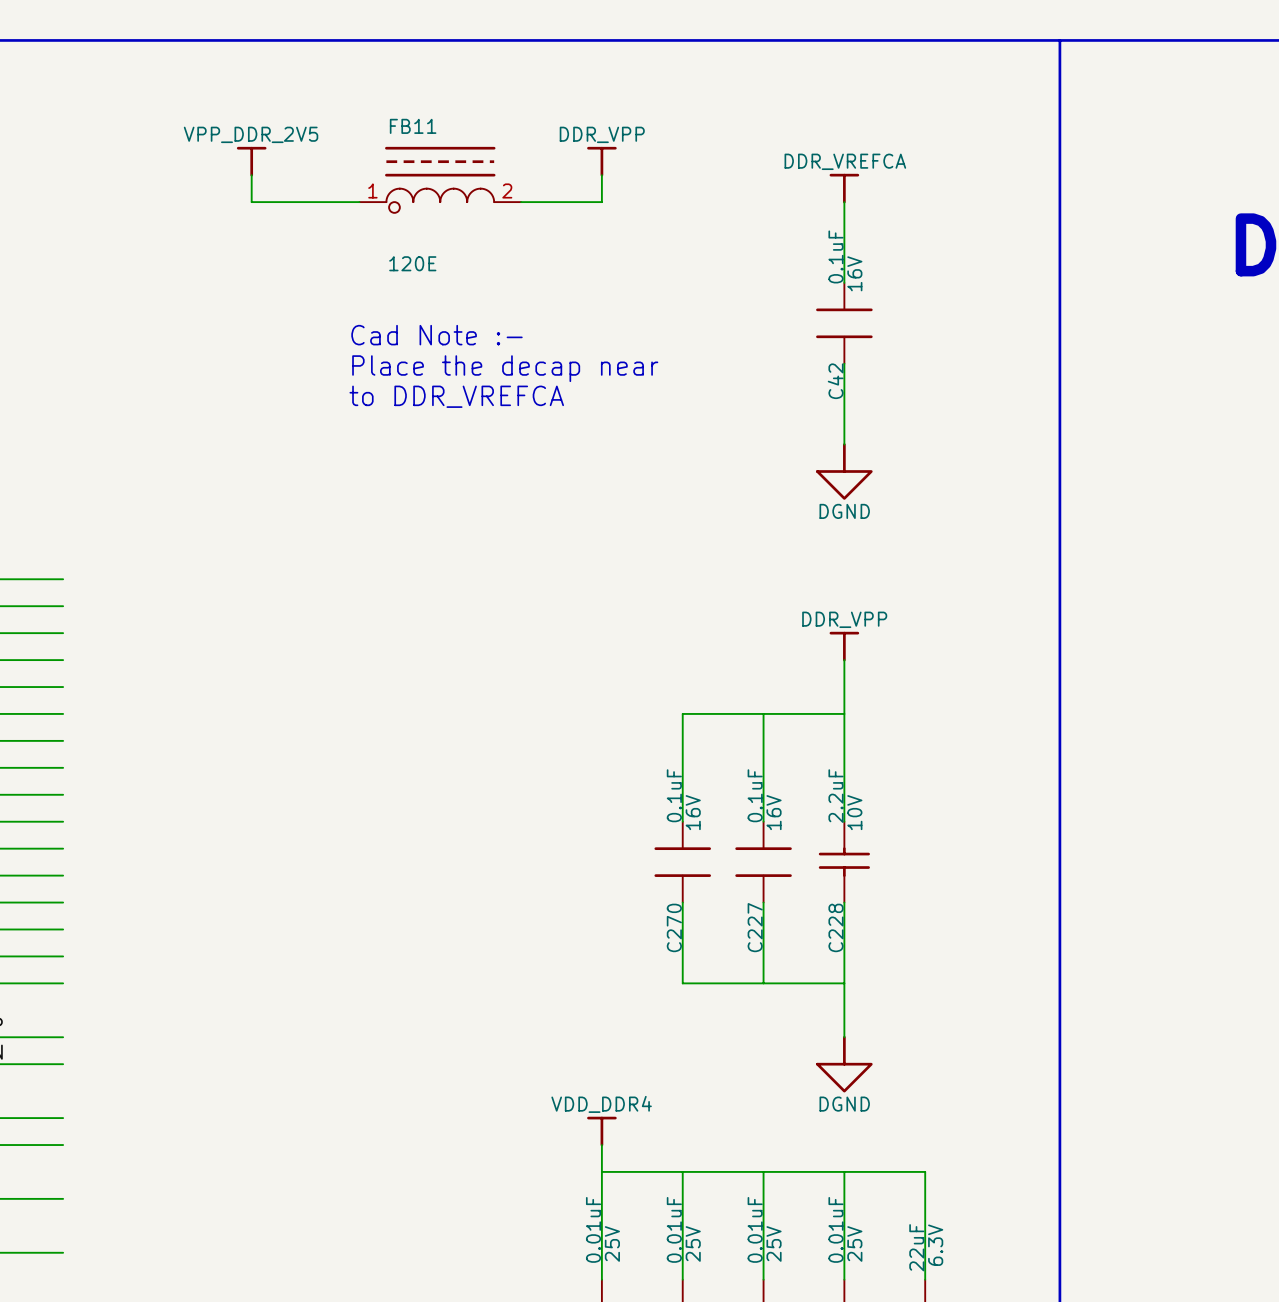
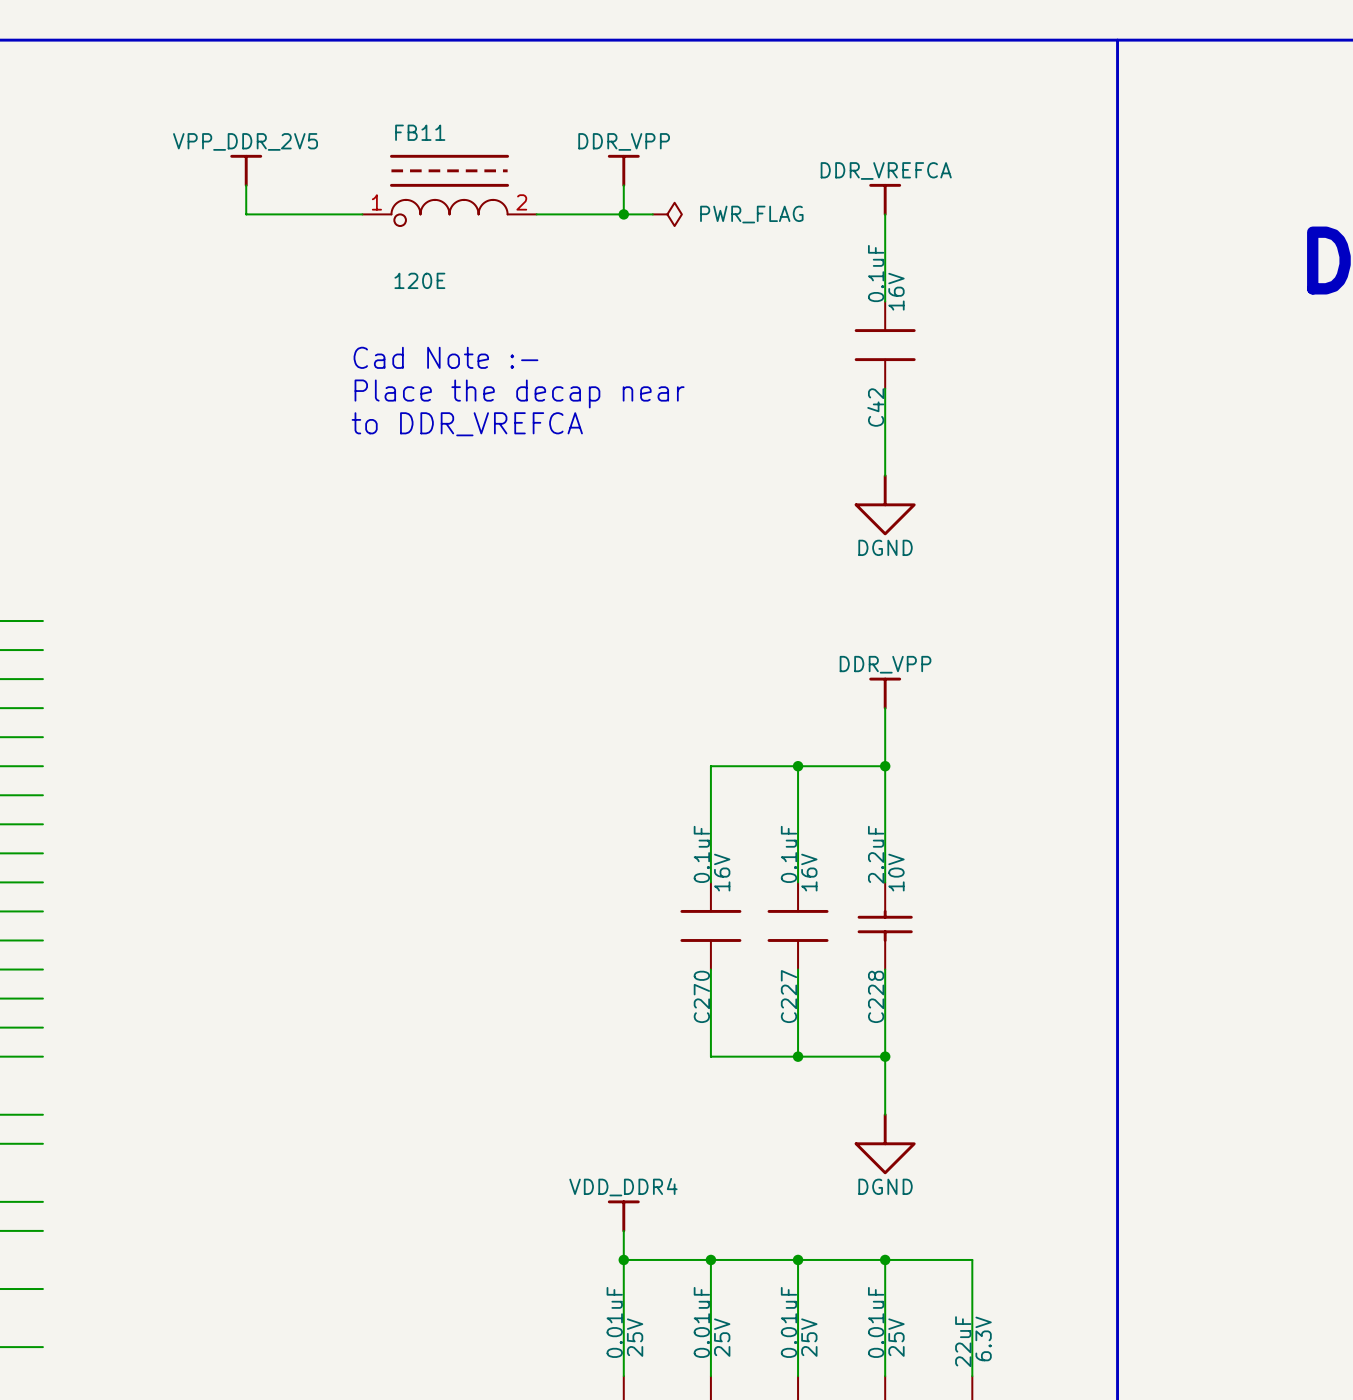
wire: none -> (623, 214) (652, 214)
junction: none -> (623, 214)
power symbol: none -> PWR_FLAG (667, 214)
junction: none -> (798, 766)
junction: none -> (885, 766)
junction: none -> (798, 1056)
junction: none -> (885, 1056)
junction: none -> (623, 1259)
junction: none -> (710, 1259)
junction: none -> (798, 1259)
junction: none -> (885, 1259)

